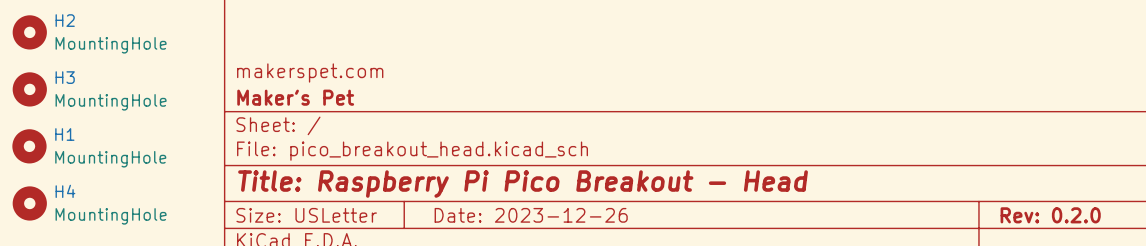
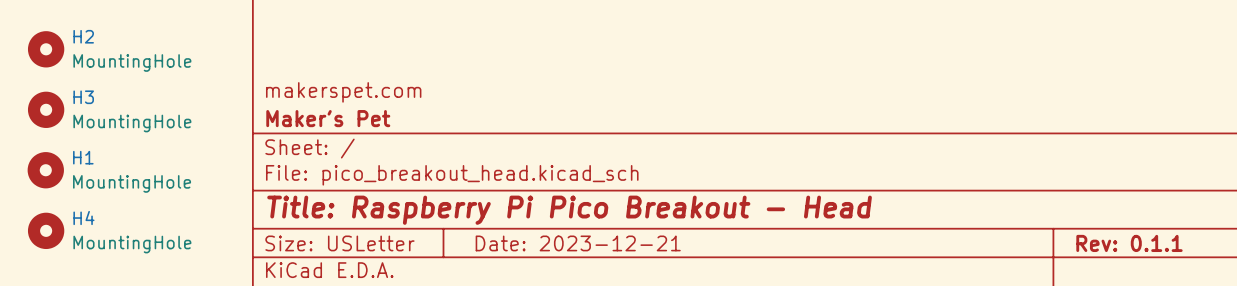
title block: Date: 2023-12-26 (531, 215) -> Date: 2023-12-21 (578, 243)
title block: Rev: 0.2.0 (1050, 215) -> Rev: 0.1.1 (1129, 243)

